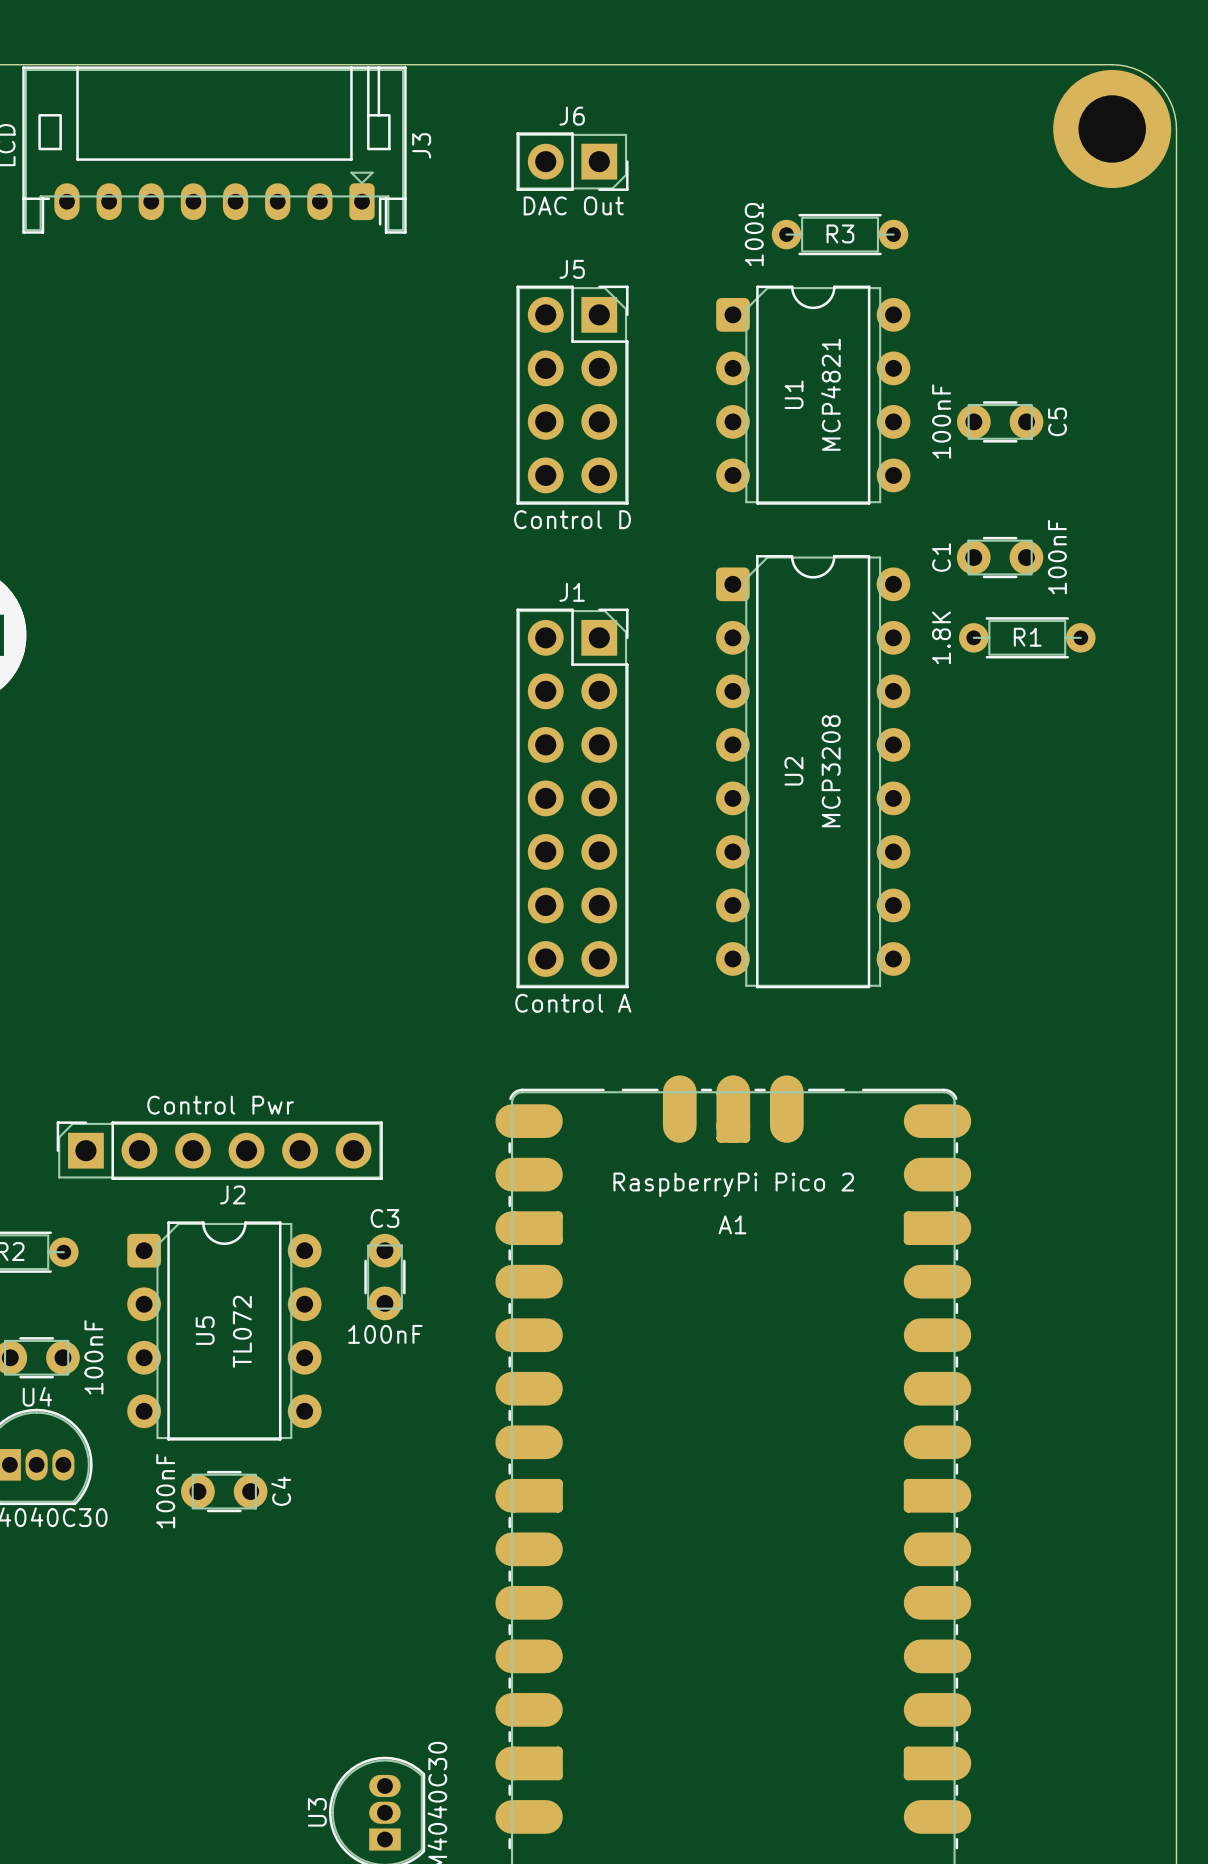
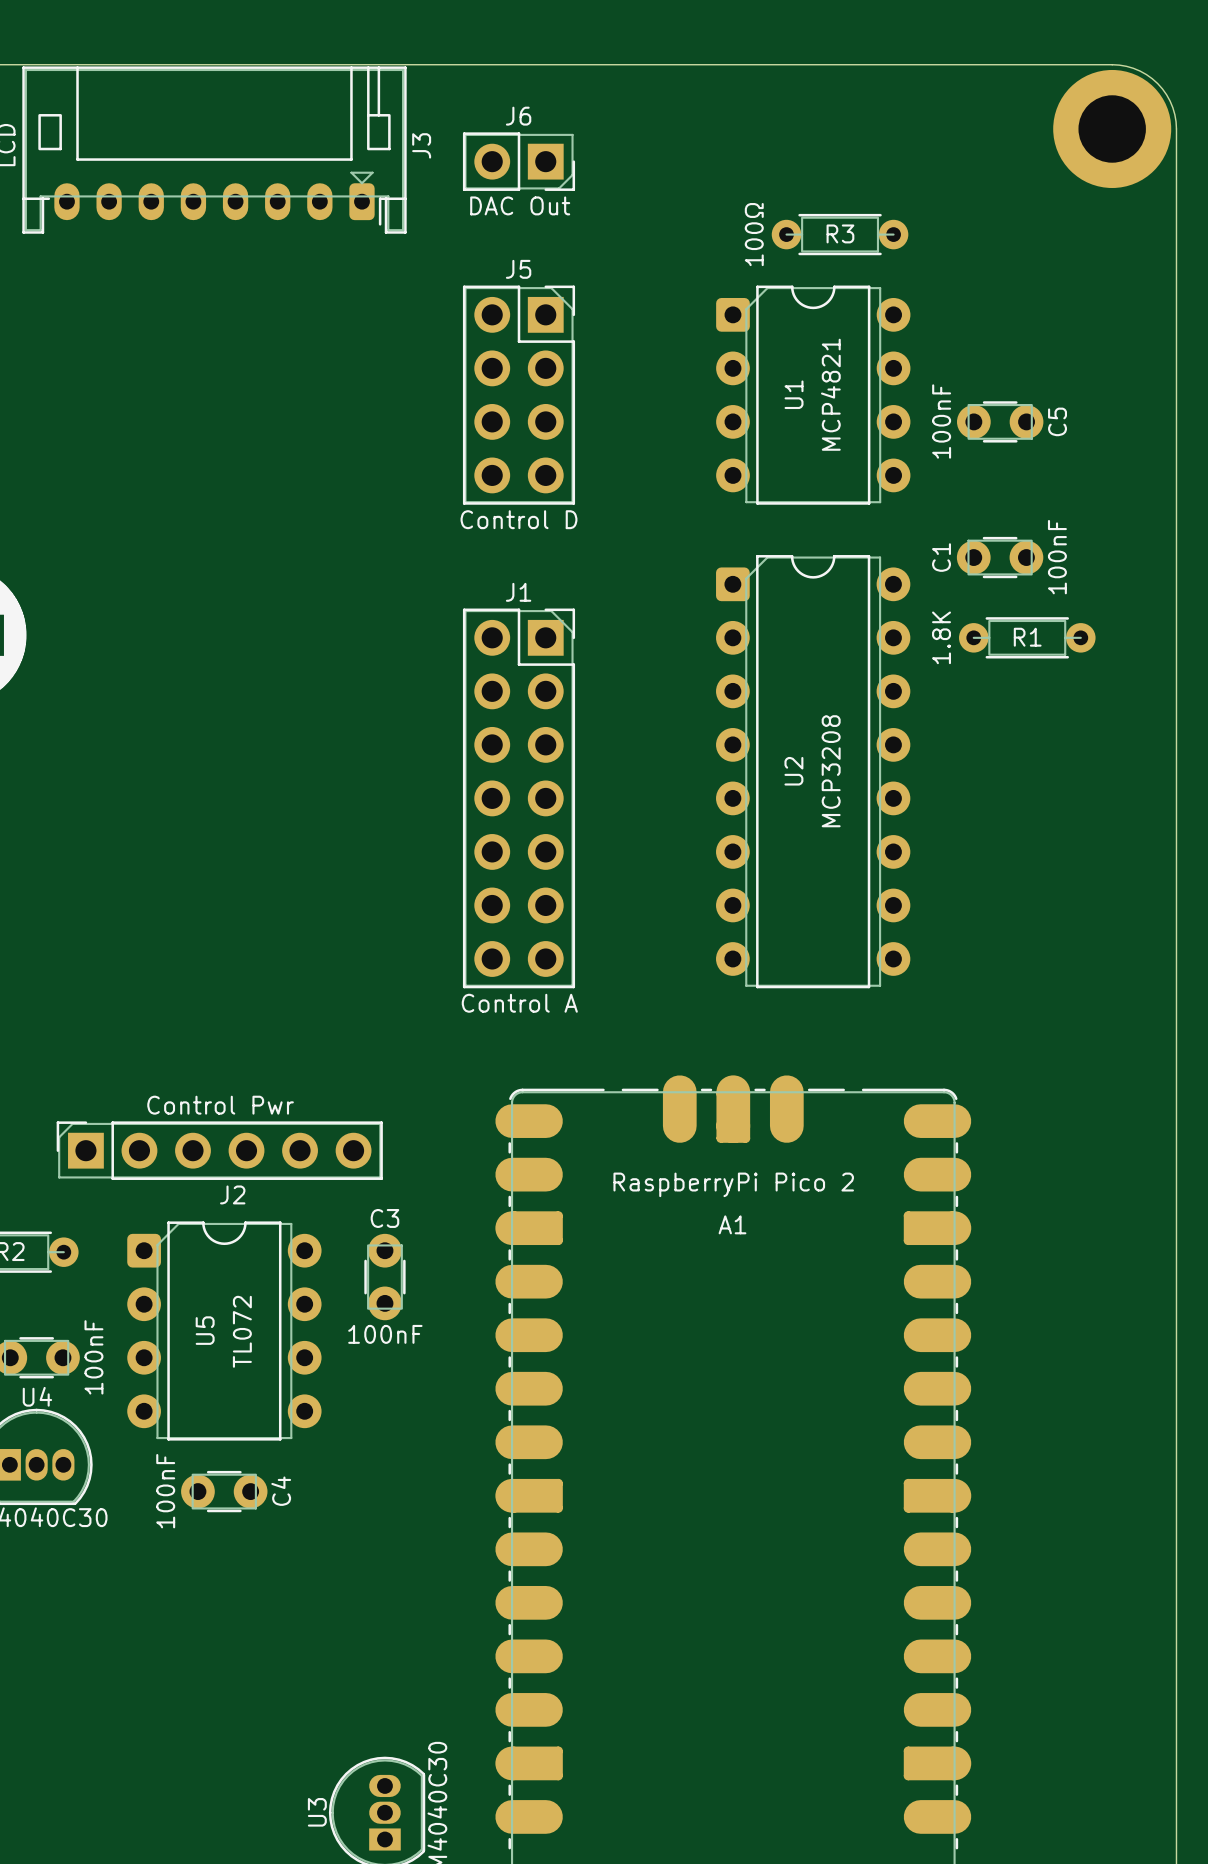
J6 position: (572, 161) -> (518, 161)
J5 position: (572, 395) -> (518, 395)
J1 position: (572, 798) -> (518, 798)

